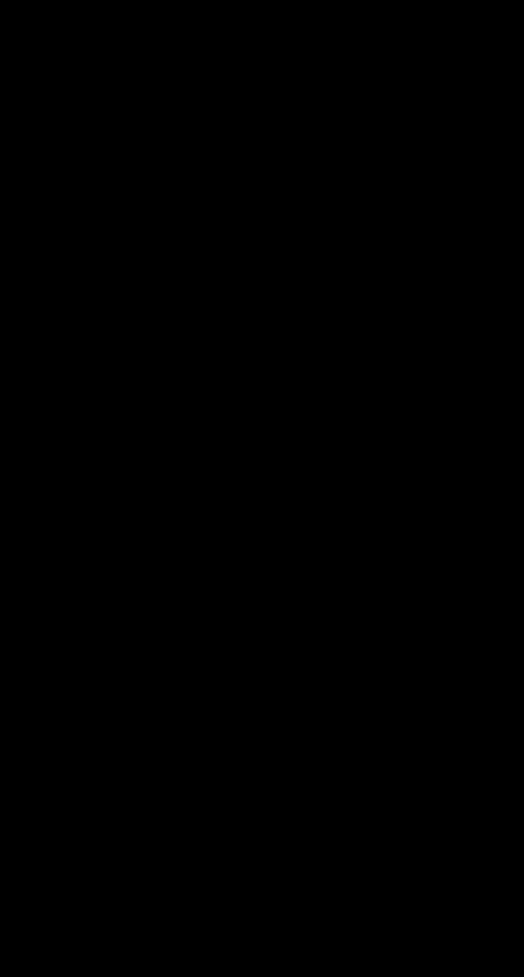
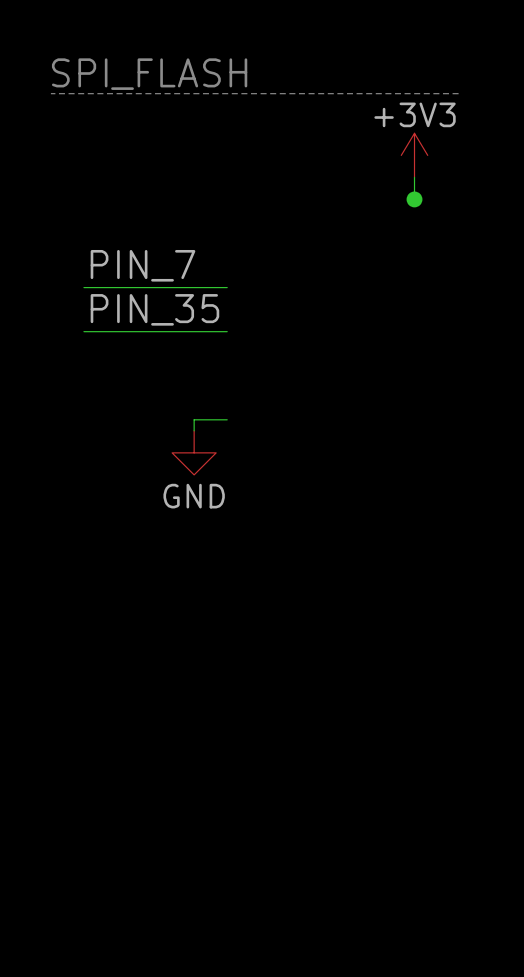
text: none -> SPI_FLASH (149, 74)
line: none -> (50, 93) (458, 93)
power symbol: none -> +3V3 (414, 155)
wire: none -> (414, 177) (414, 199)
junction: none -> (414, 199)
label: none -> PIN_7 (142, 265)
wire: none -> (83, 287) (227, 287)
label: none -> PIN_35 (154, 309)
wire: none -> (83, 331) (227, 331)
wire: none -> (227, 419) (194, 419) (194, 430)
power symbol: none -> GND (194, 452)

